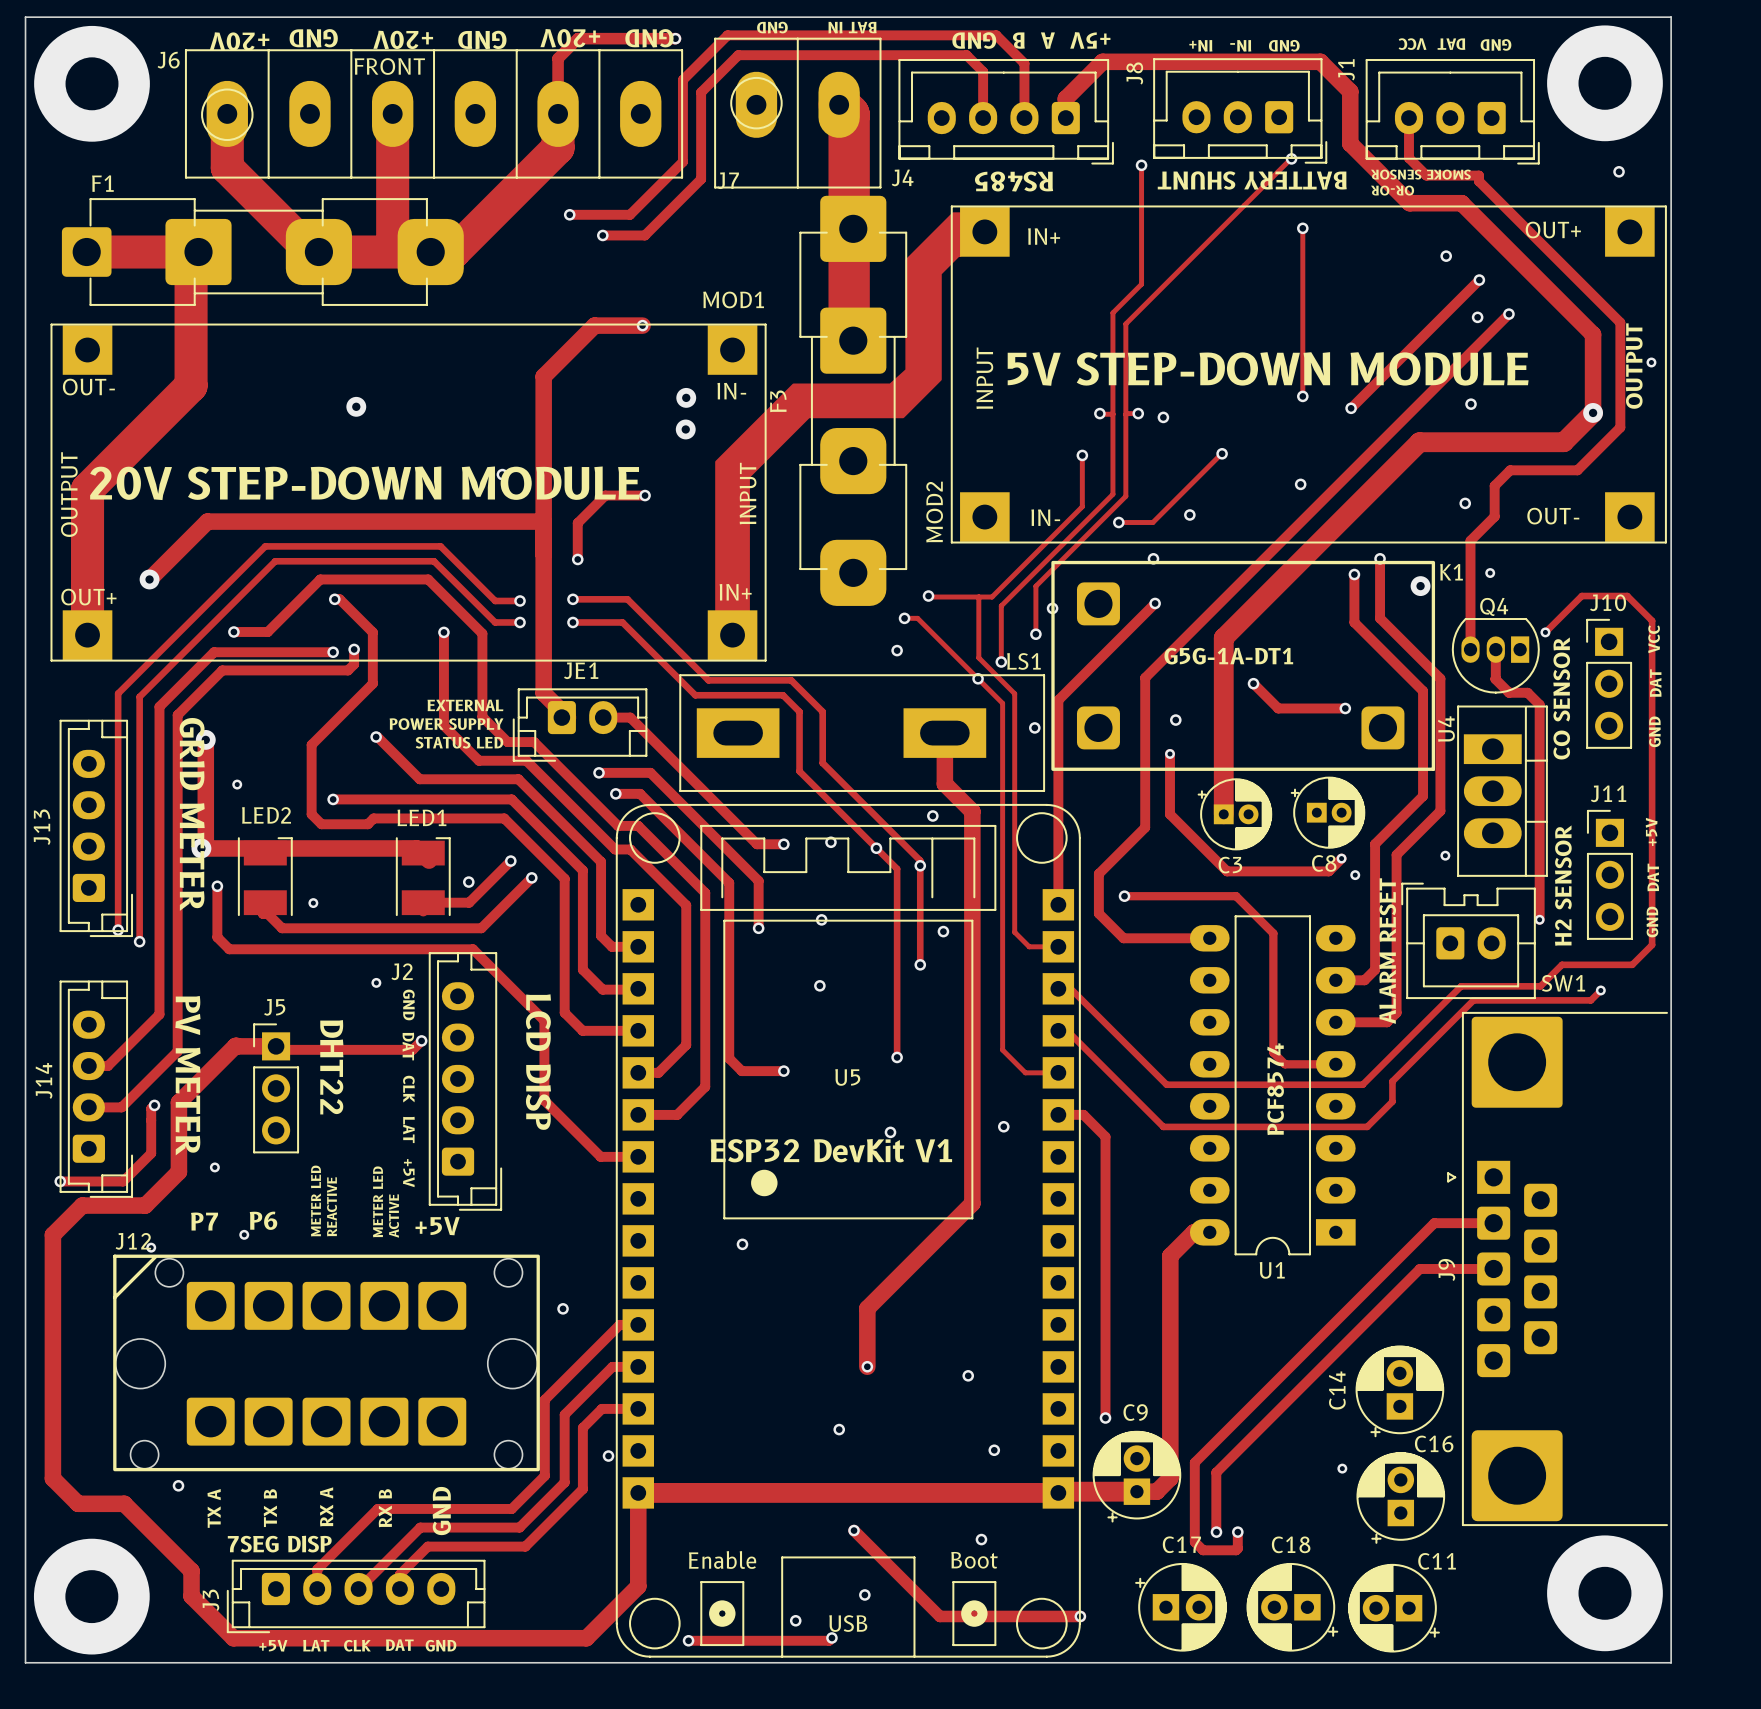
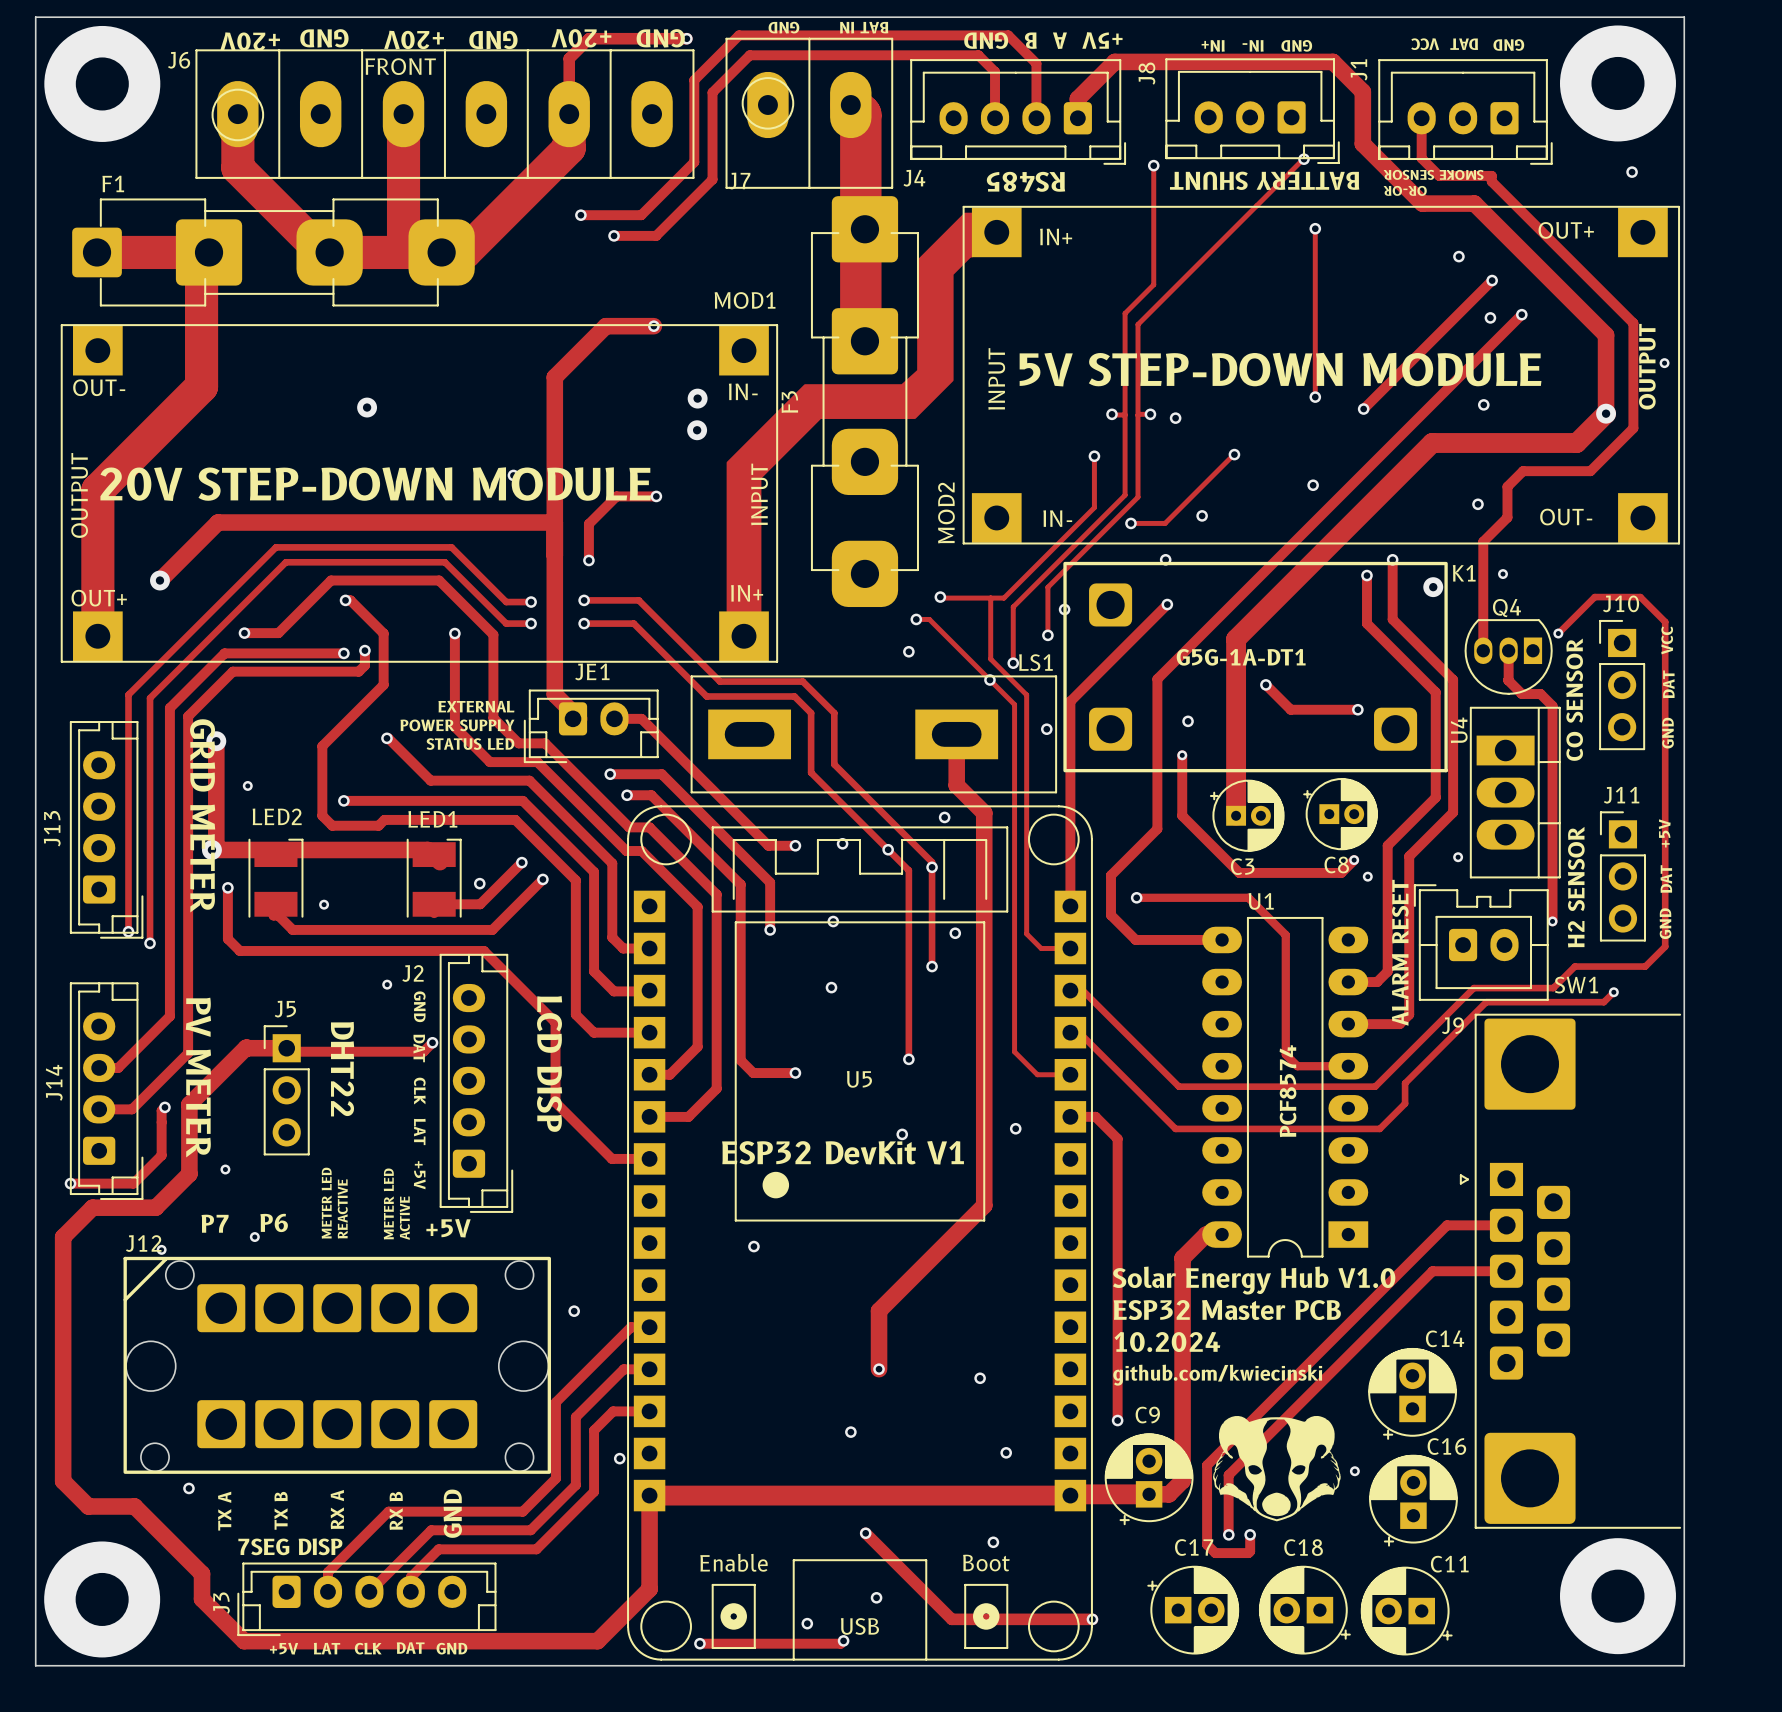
J9 name rotation: 0° (1446, 1269) -> 90° clockwise (1452, 1025)
J9 name position: J9 (1446, 1269) -> J9 (1452, 1025)
U1 name position: U1 (1272, 1270) -> U1 (1261, 901)
text: none -> Solar Energy Hub V1.0 (1254, 1280)
text: none -> ESP32 Master PCB (1227, 1309)
text: none -> 10.2024 (1167, 1342)
text: none -> github.com/kwiecinski (1217, 1375)
C14 name rotation: 0° (1337, 1390) -> 90° clockwise (1445, 1338)
C14 name position: C14 (1337, 1390) -> C14 (1445, 1338)
drawing: none -> [1213, 1415, 1341, 1522]

